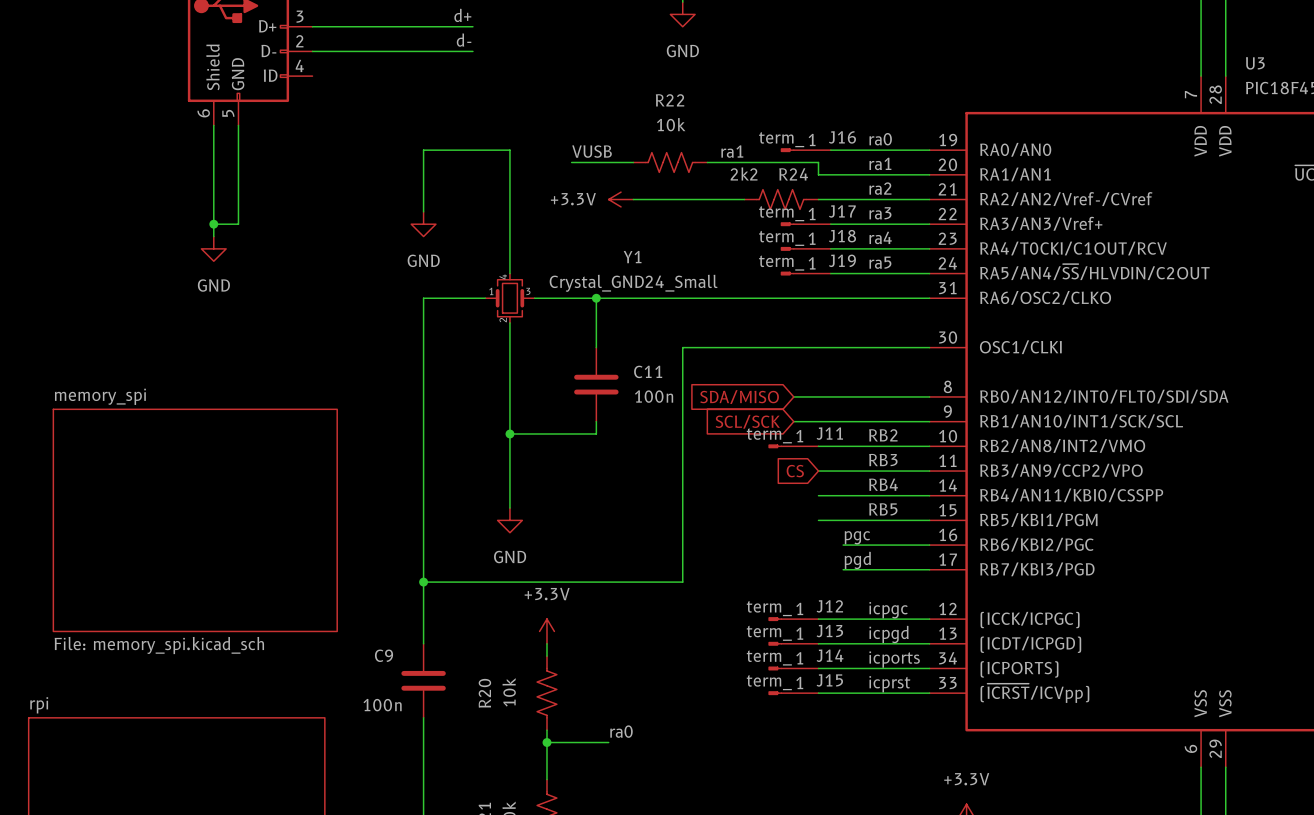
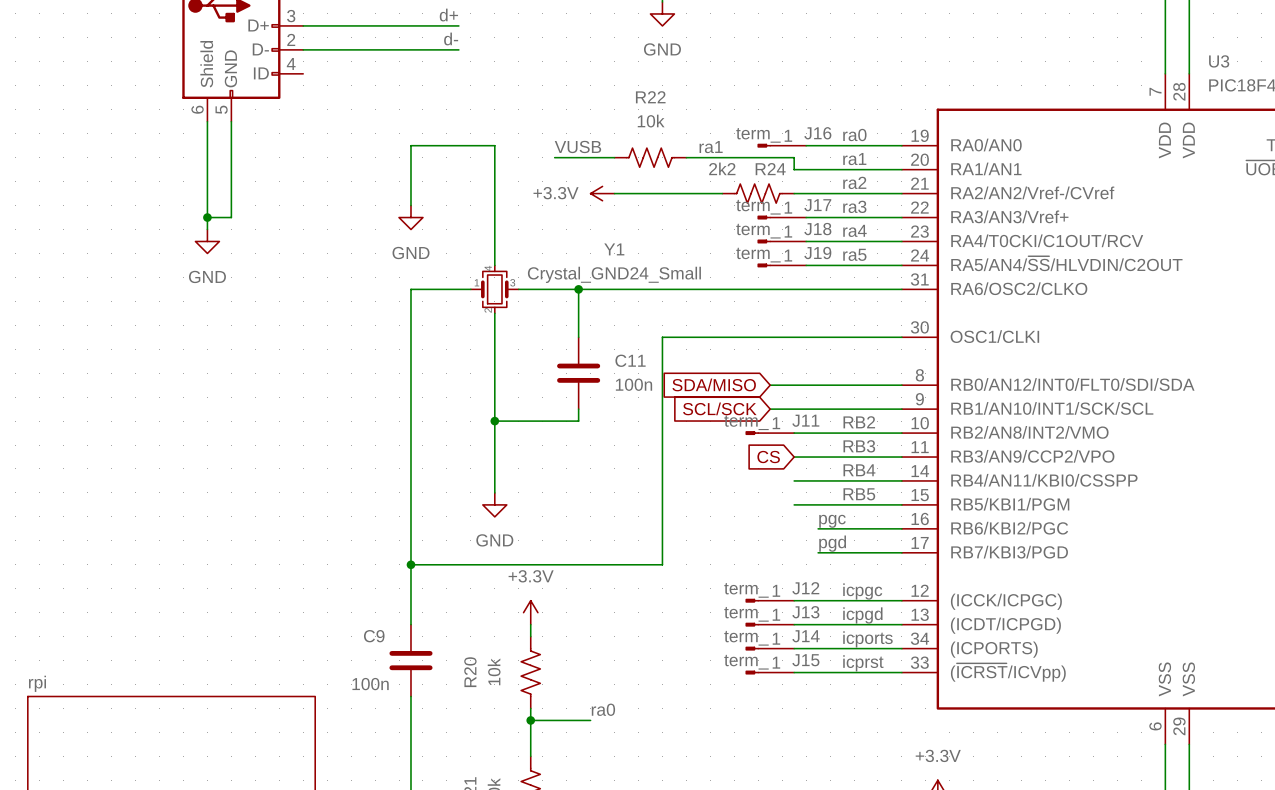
sheet memory_spi: File: memory_spi.kicad_sch (195, 520) -> none

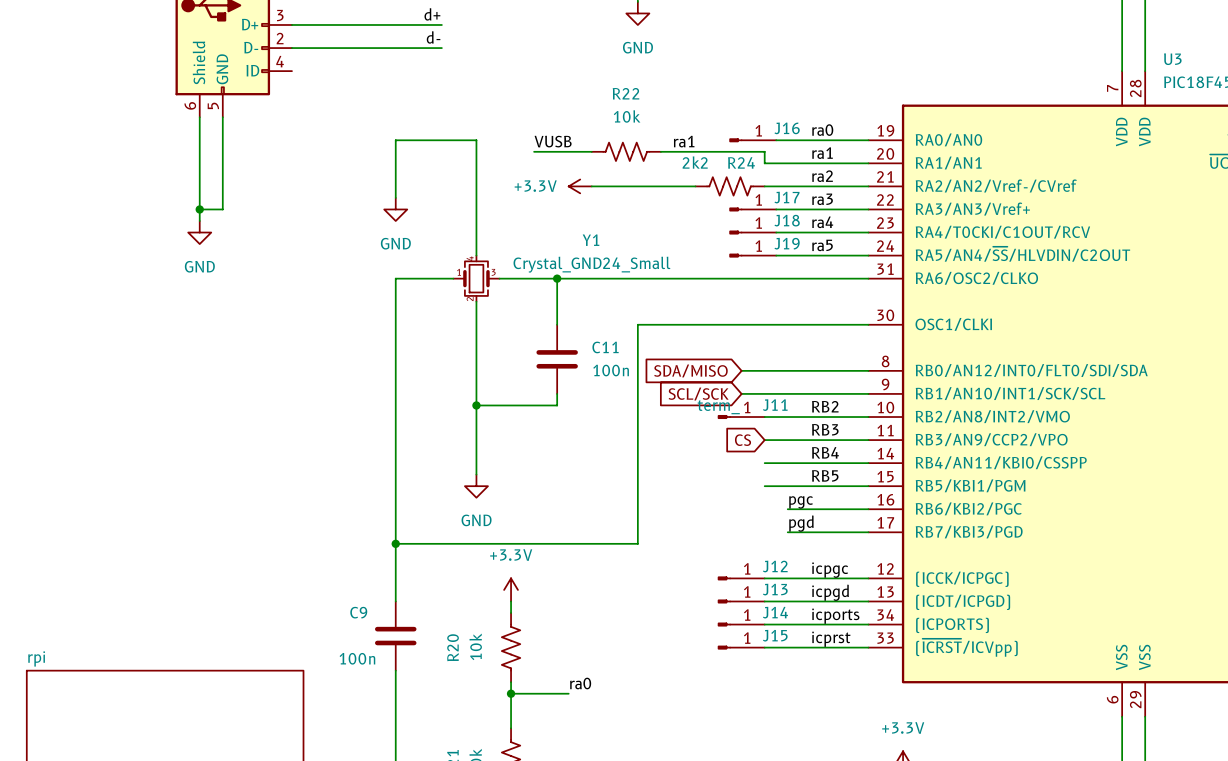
J16 value: term_ (758, 135) -> none
J17 value: term_ (758, 207) -> none
J18 value: term_ (758, 231) -> none
J19 value: term_ (758, 255) -> none
J12 value: term_ (746, 590) -> none
J13 value: term_ (746, 614) -> none
J14 value: term_ (746, 638) -> none
J15 value: term_ (746, 662) -> none

